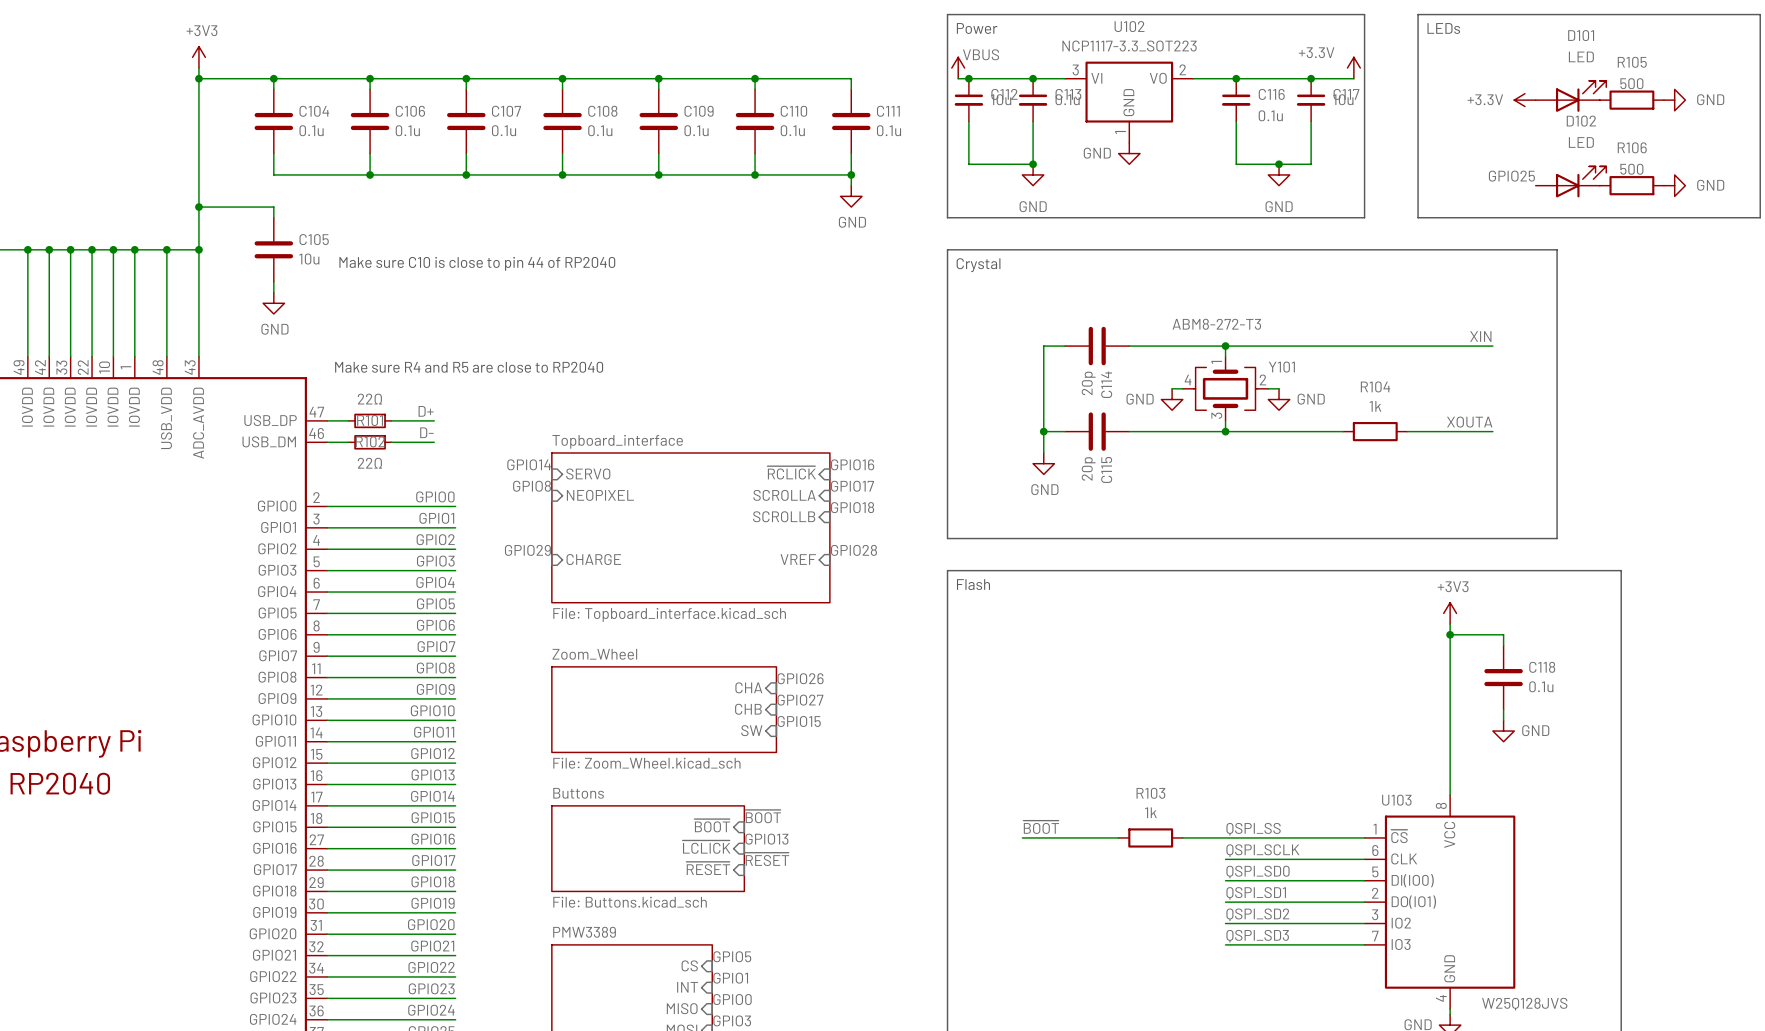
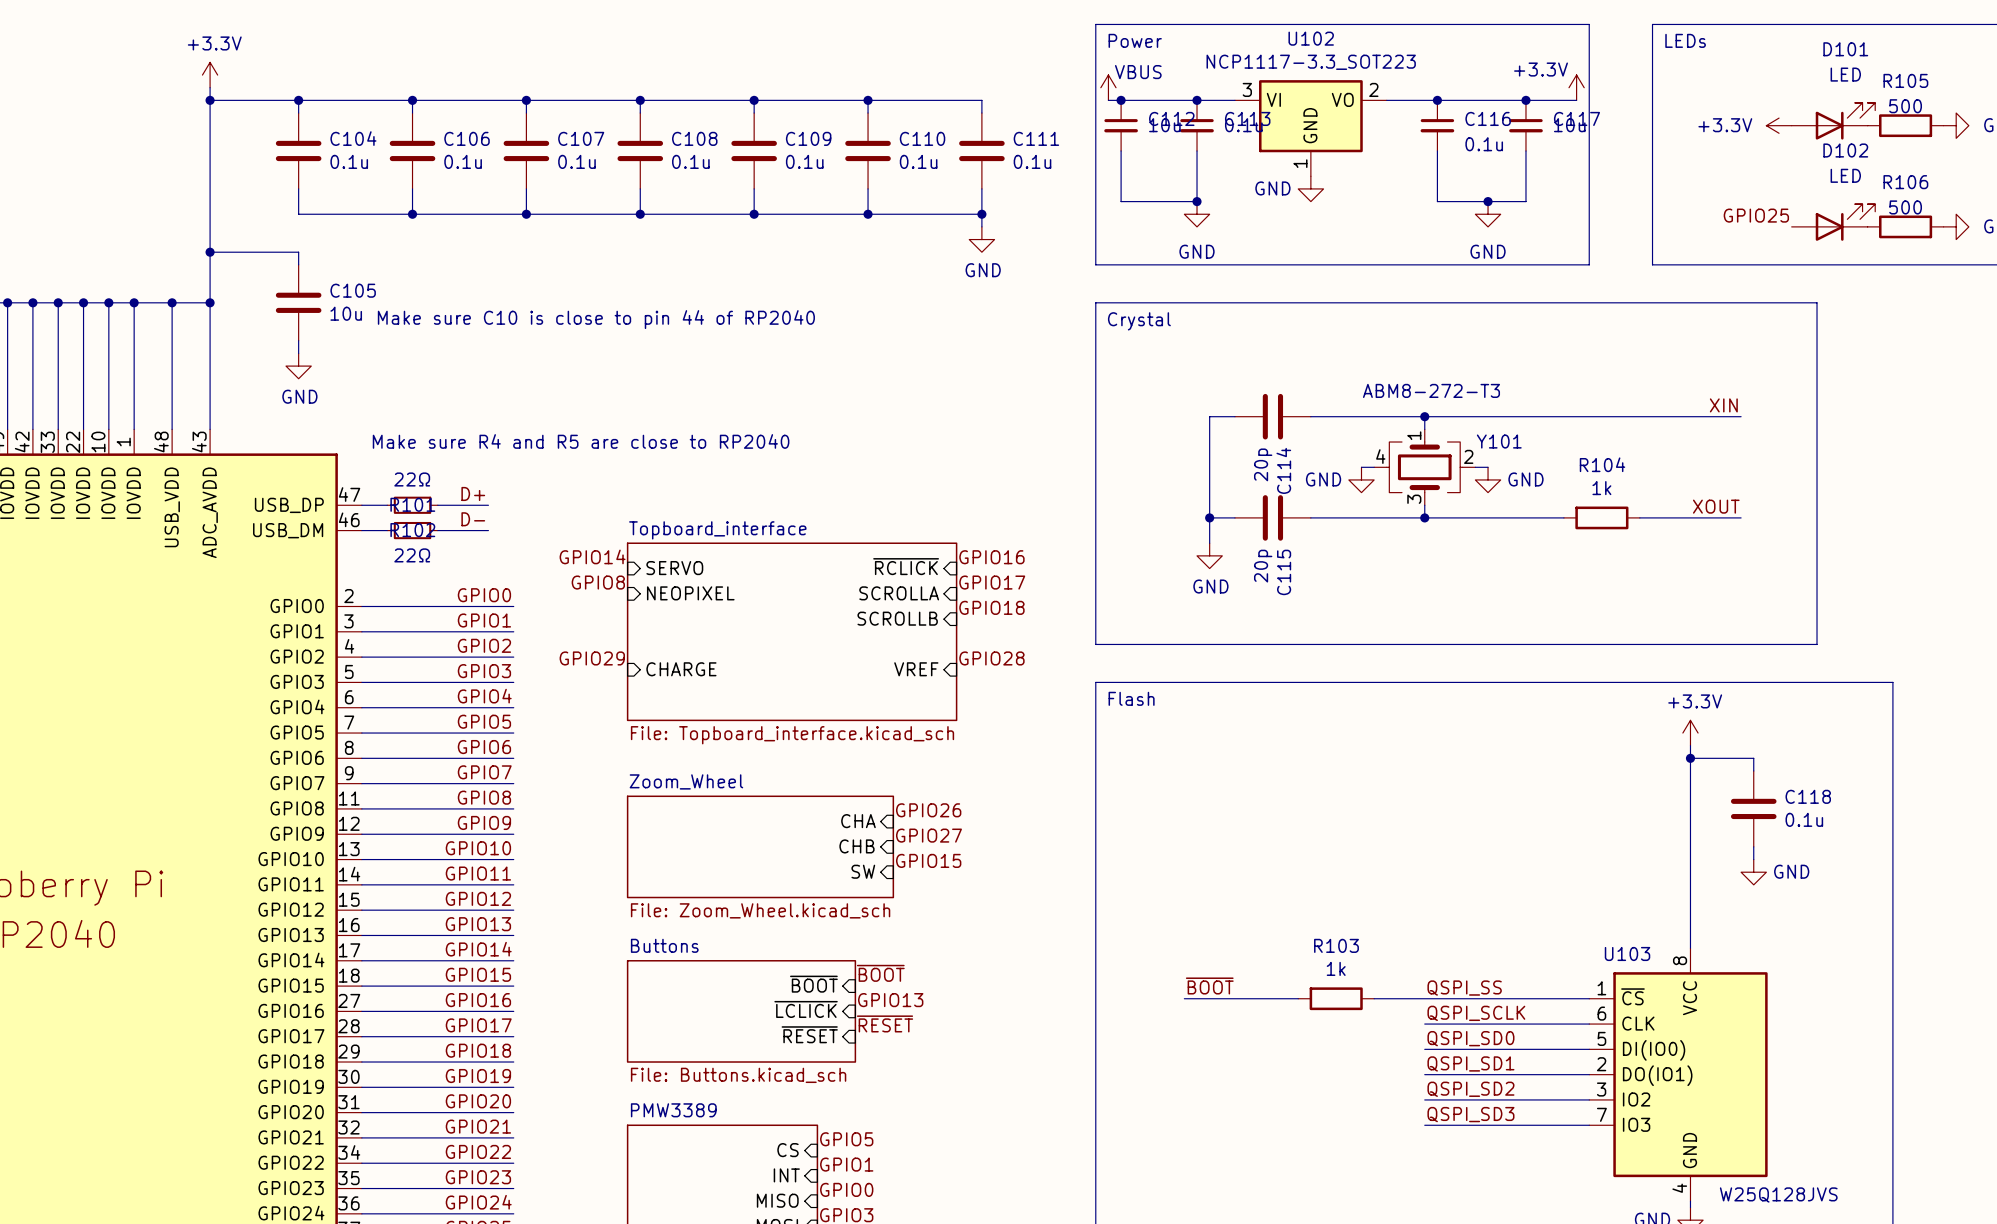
power symbol: +3V3 (198, 57) -> +3.3V (210, 75)
label: XOUTA (1469, 422) -> XOUT (1716, 506)
power symbol: +3V3 (1450, 613) -> +3.3V (1690, 733)

